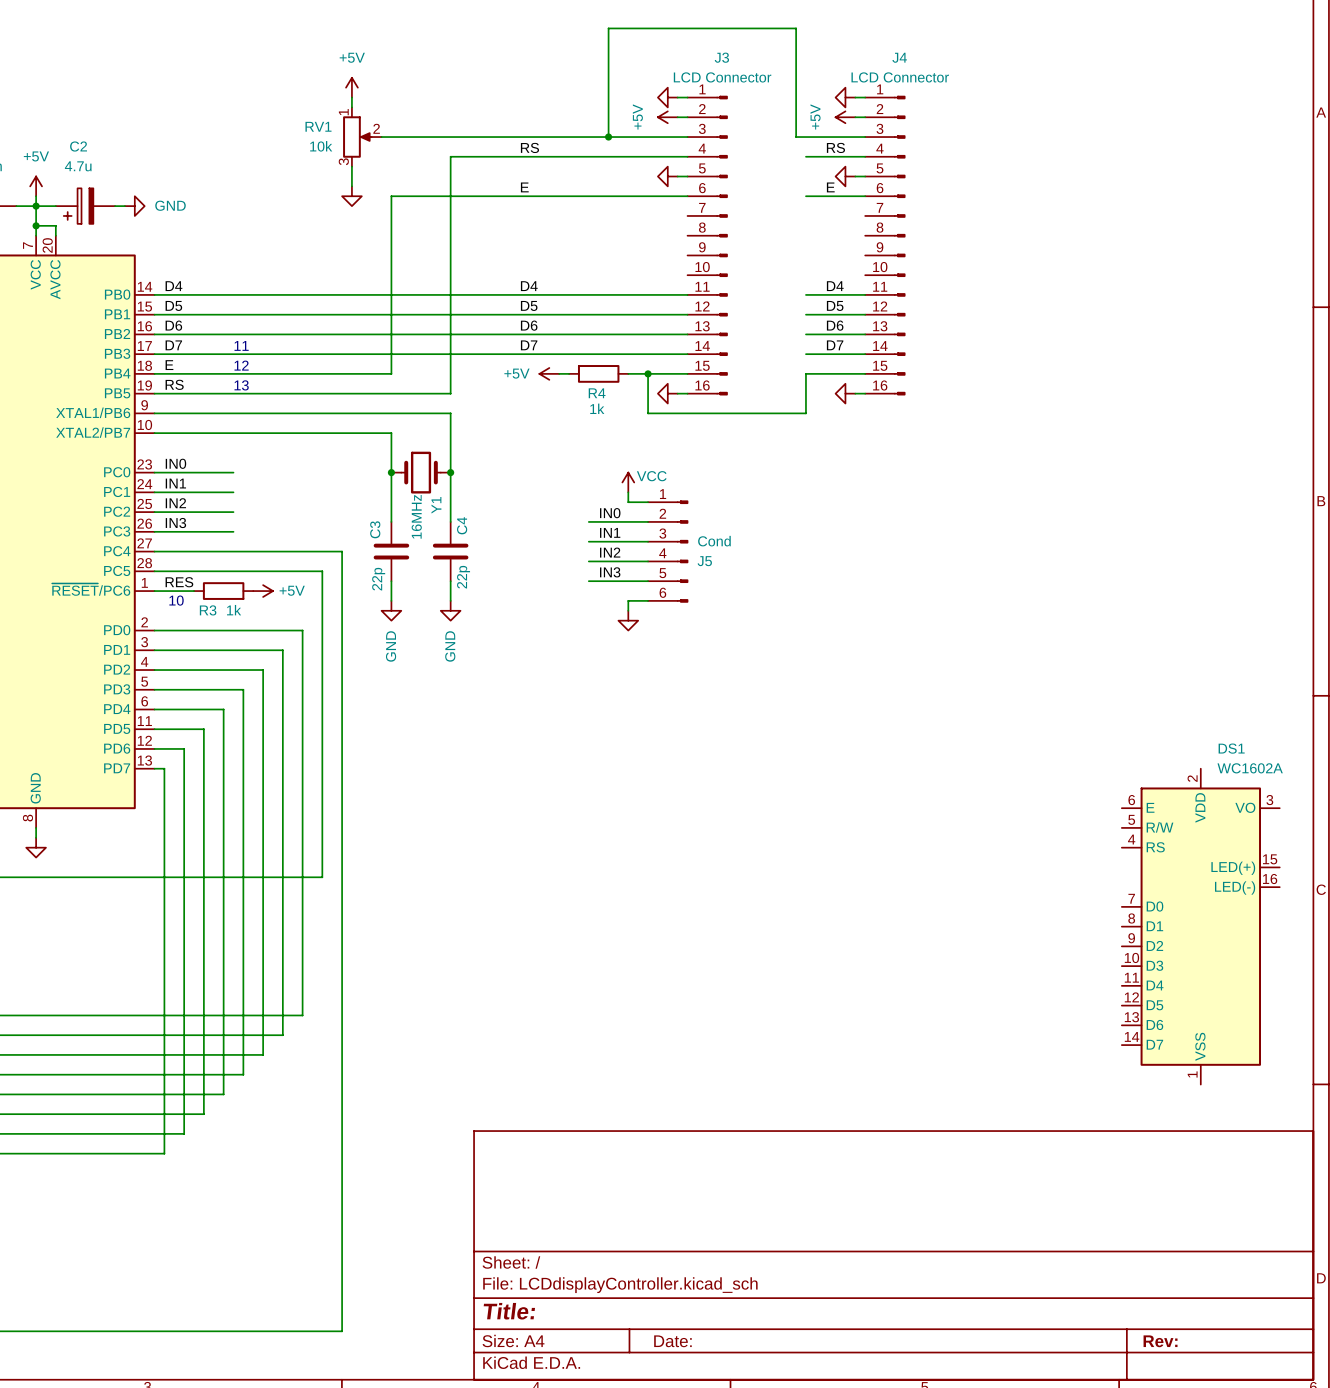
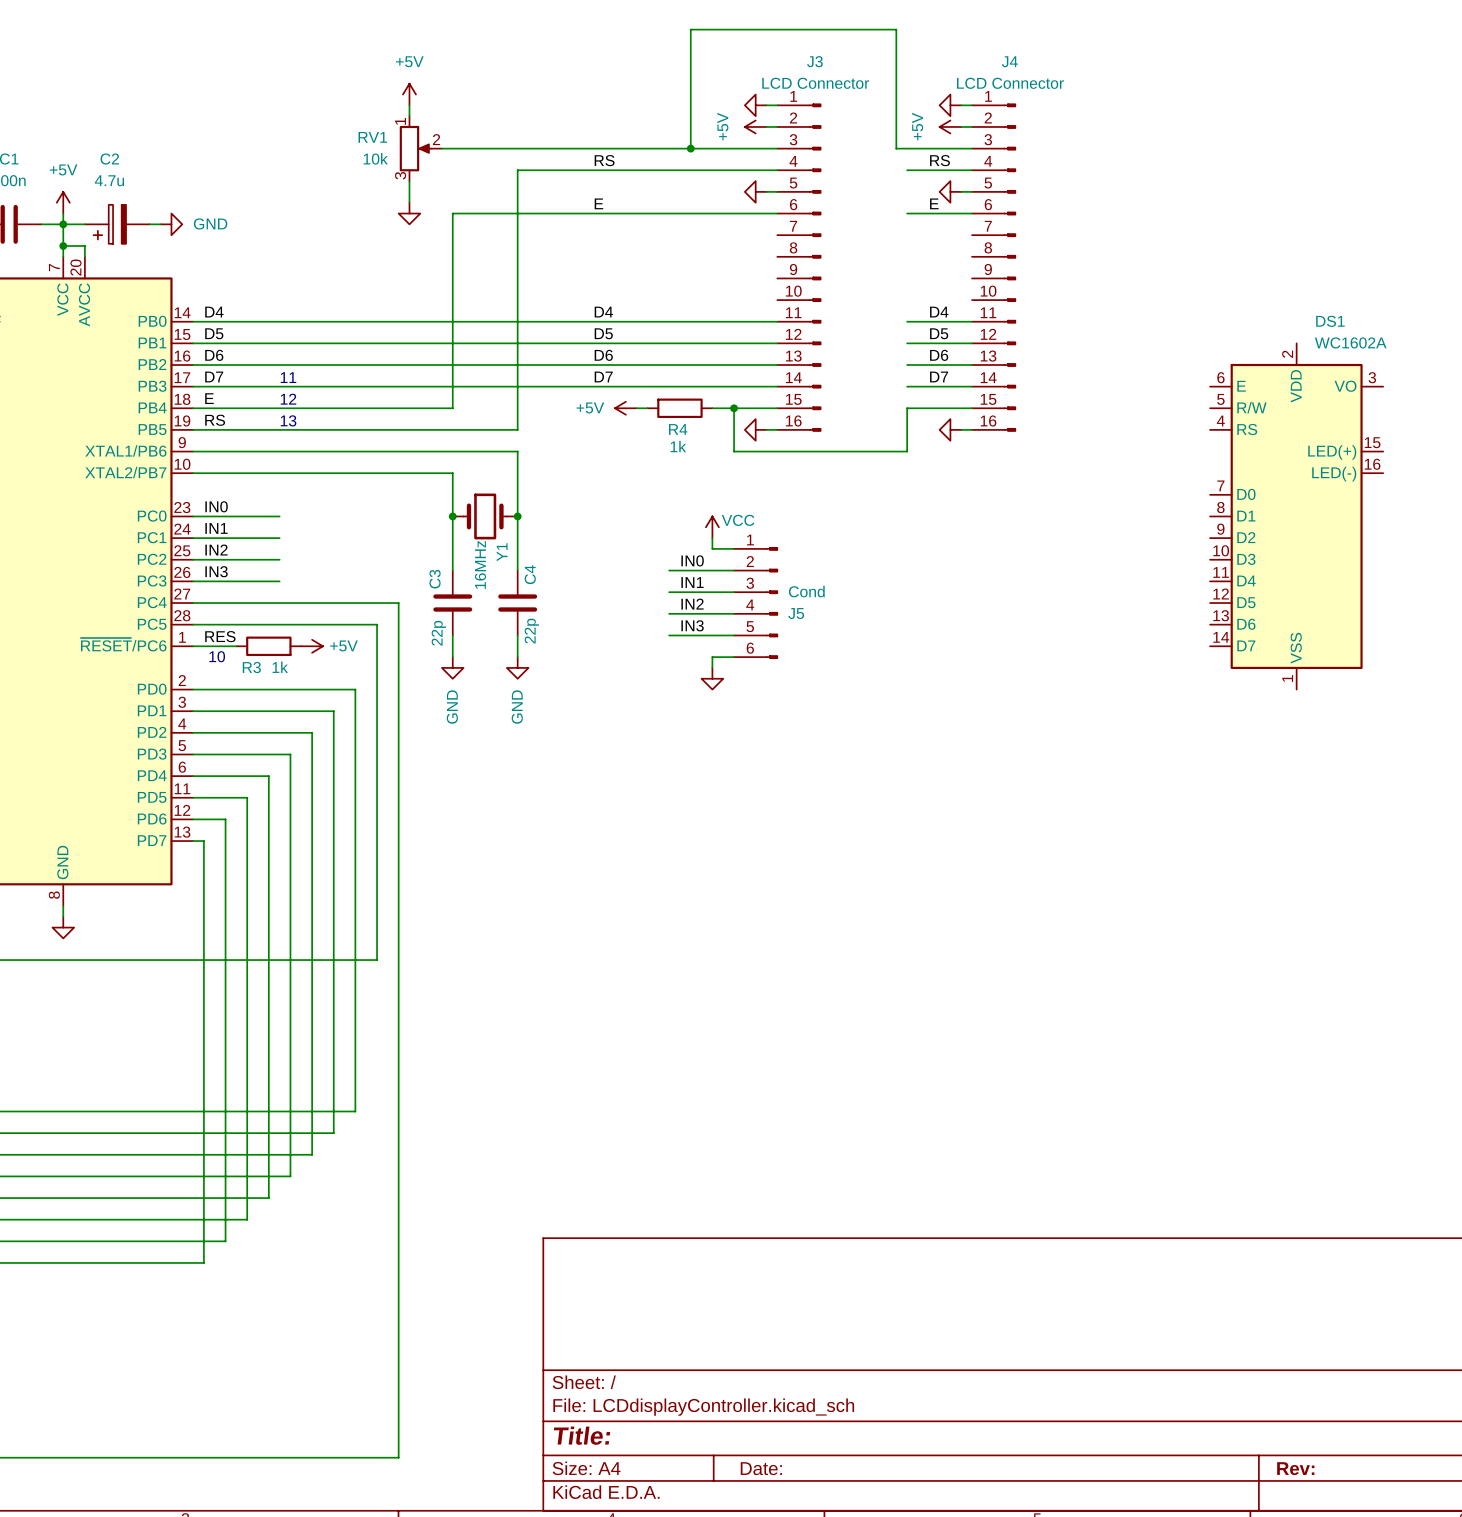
DS1 position: (1200, 926) -> (1296, 516)

